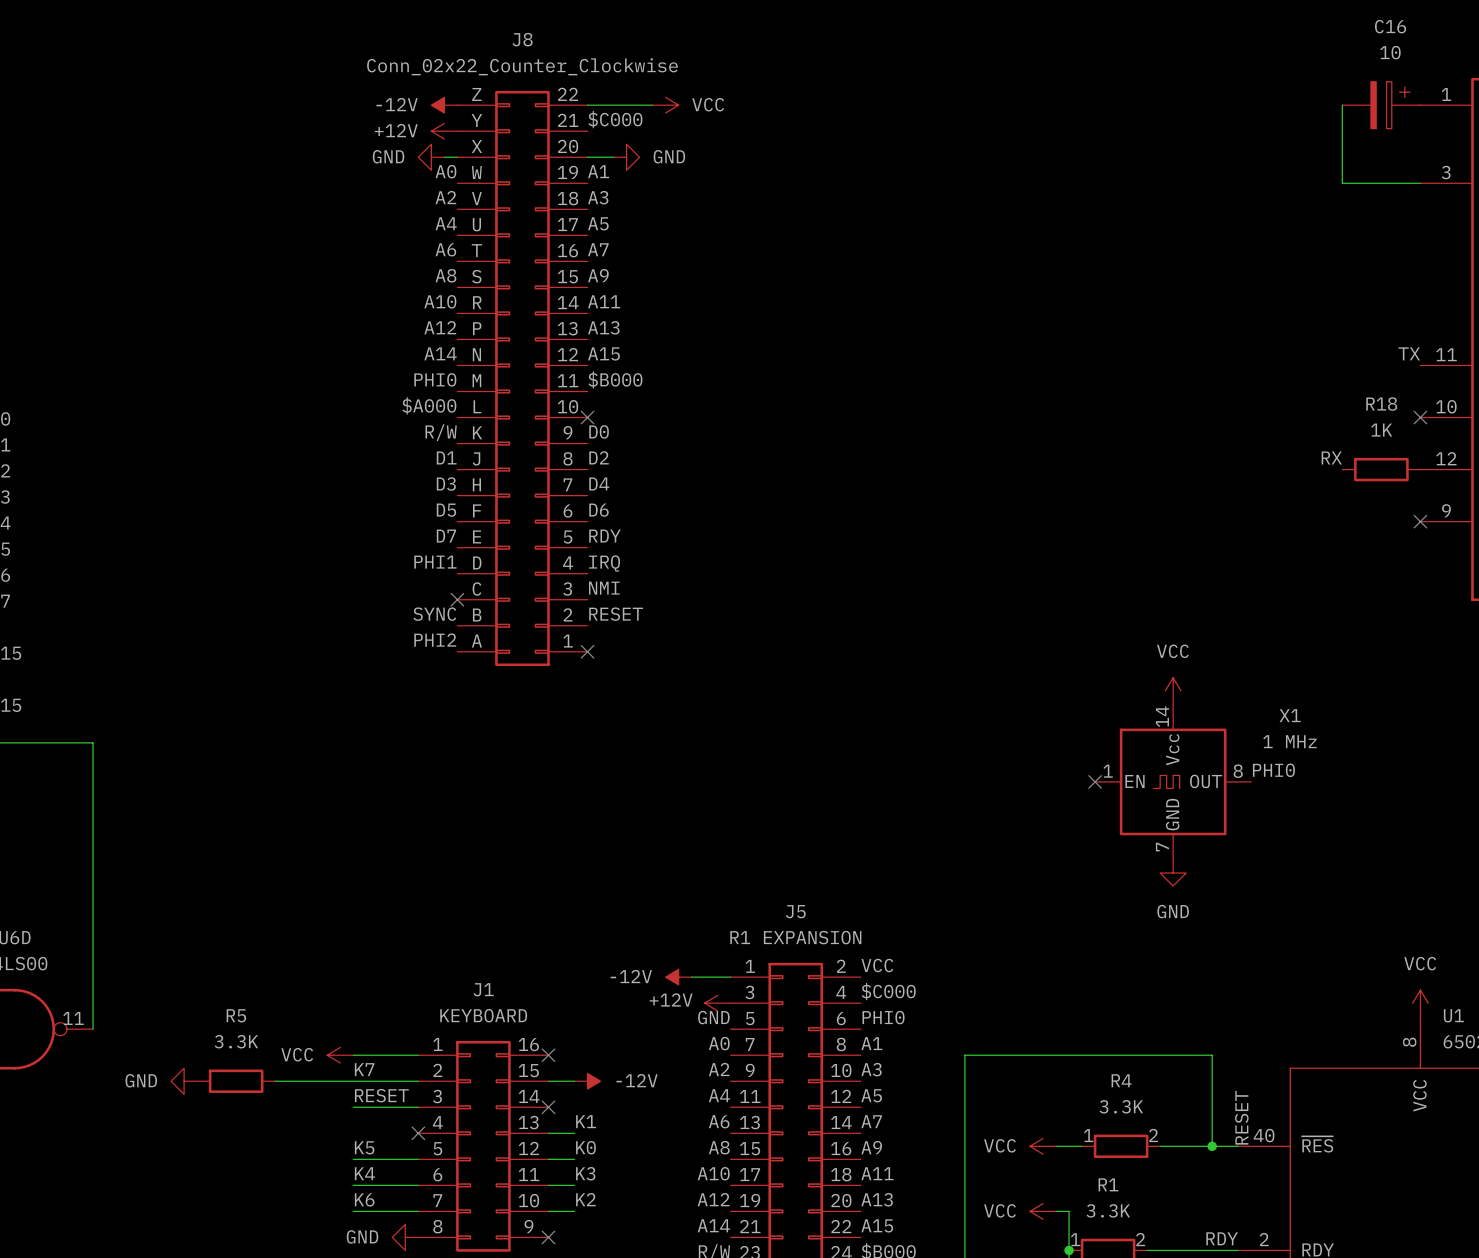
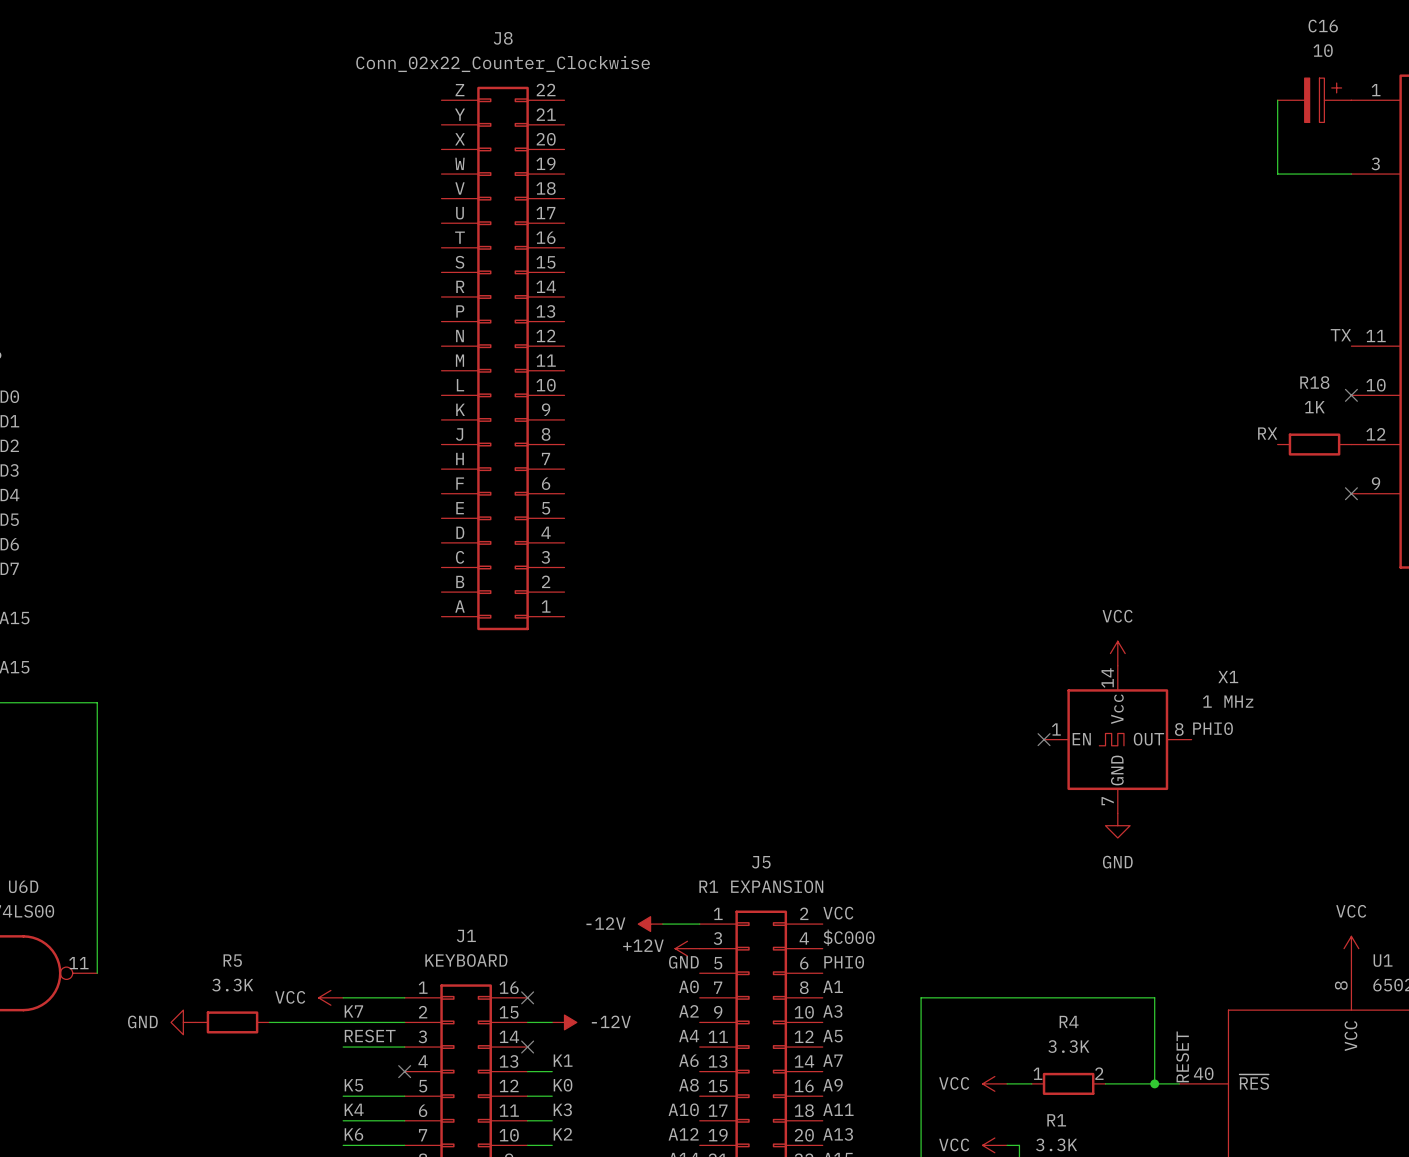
power symbol: -12V (444, 105) -> none
wire: (587, 105) (652, 105) -> none
power symbol: VCC (665, 105) -> none
label: $C000 (615, 119) -> none
power symbol: +12V (444, 131) -> none
power symbol: GND (431, 157) -> none
wire: (444, 157) (457, 157) -> none
wire: (587, 157) (613, 157) -> none
power symbol: GND (626, 157) -> none
label: A0 (445, 171) -> none
label: A1 (598, 171) -> none
label: A2 (445, 197) -> none
label: A3 (598, 197) -> none
label: A4 (446, 223) -> none
label: A5 (598, 223) -> none
label: A6 (445, 249) -> none
label: A7 (598, 249) -> none
label: A8 (445, 275) -> none
label: A9 (598, 275) -> none
label: A10 (440, 301) -> none
label: A11 (604, 301) -> none
label: A12 (440, 327) -> none
label: A13 (603, 327) -> none
label: A14 (440, 353) -> none
label: A15 (603, 353) -> none
label: PHI0 (435, 379) -> none
label: $B000 (615, 379) -> none
label: $A000 (429, 405) -> none
no-connect mark: (587, 417) -> none
label: D0 (599, 431) -> none
label: R/W (441, 432) -> none
label: D1 (446, 457) -> none
label: D2 (599, 457) -> none
label: D3 (446, 484) -> none
label: D4 (599, 484) -> none
label: D5 (446, 510) -> none
label: D6 (599, 510) -> none
label: D7 (446, 536) -> none
label: RDY (604, 536) -> none
label: PHI1 (435, 562) -> none
label: IRQ (604, 563) -> none
label: NMI (604, 588) -> none
no-connect mark: (457, 599) -> none
label: SYNC (434, 614) -> none
label: RESET (616, 614) -> none
label: PHI2 (435, 640) -> none
no-connect mark: (587, 651) -> none

